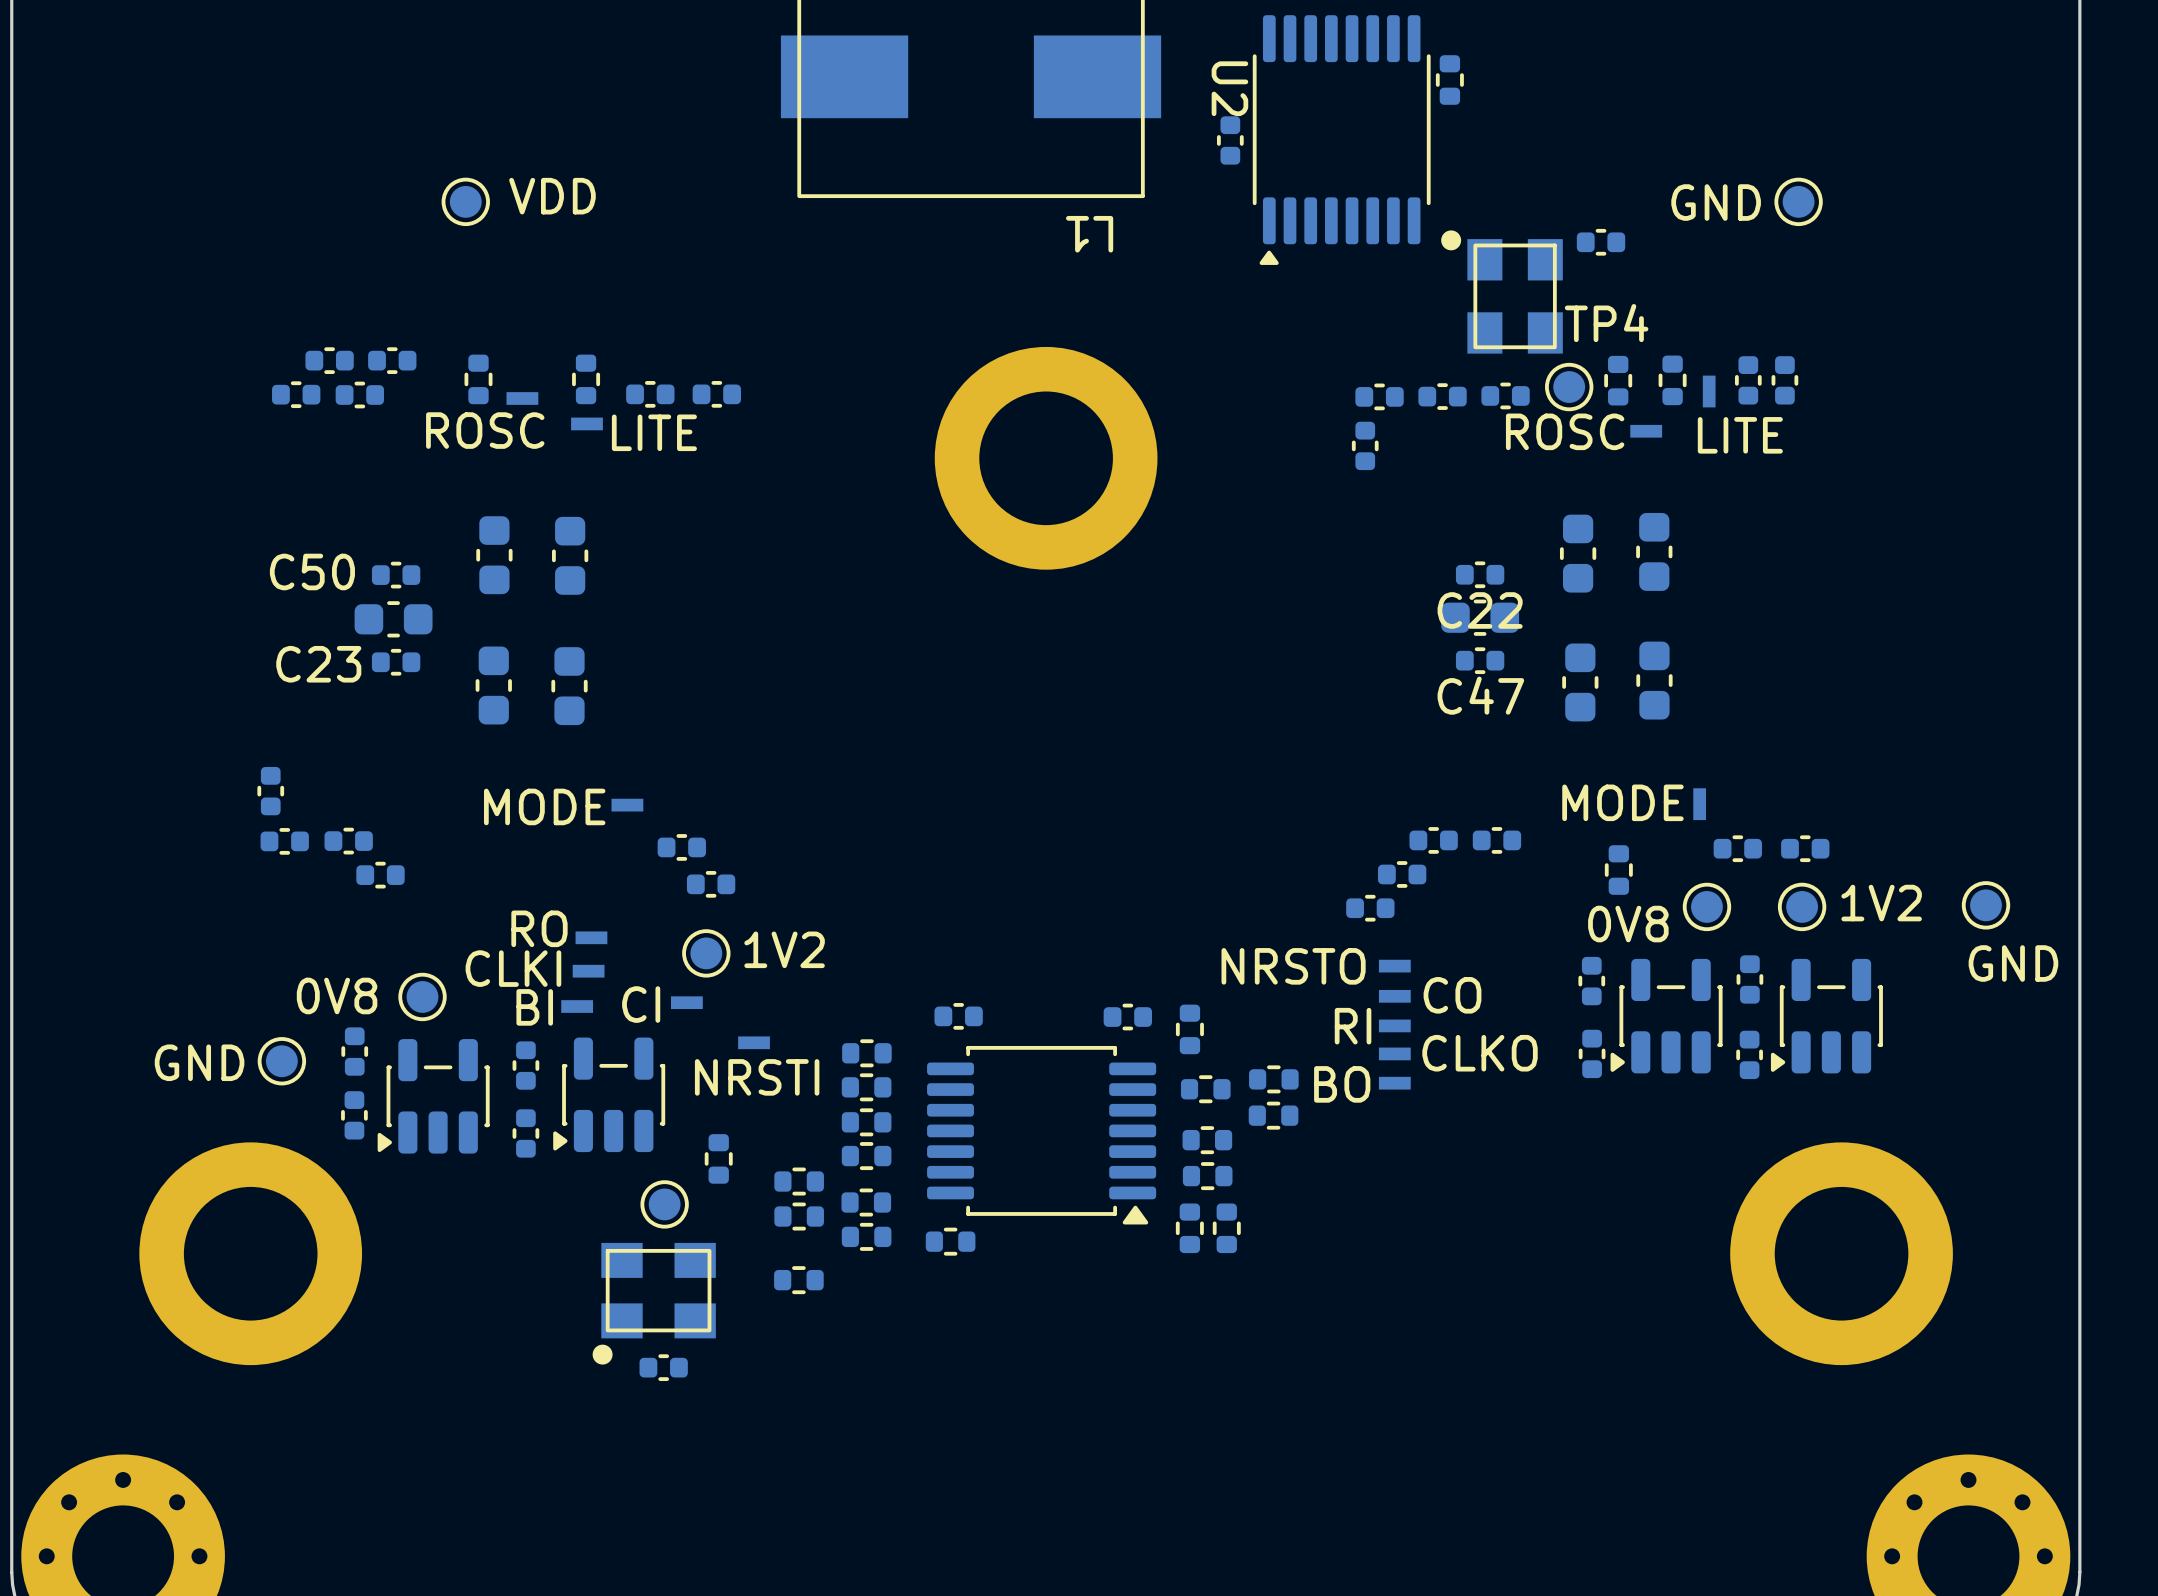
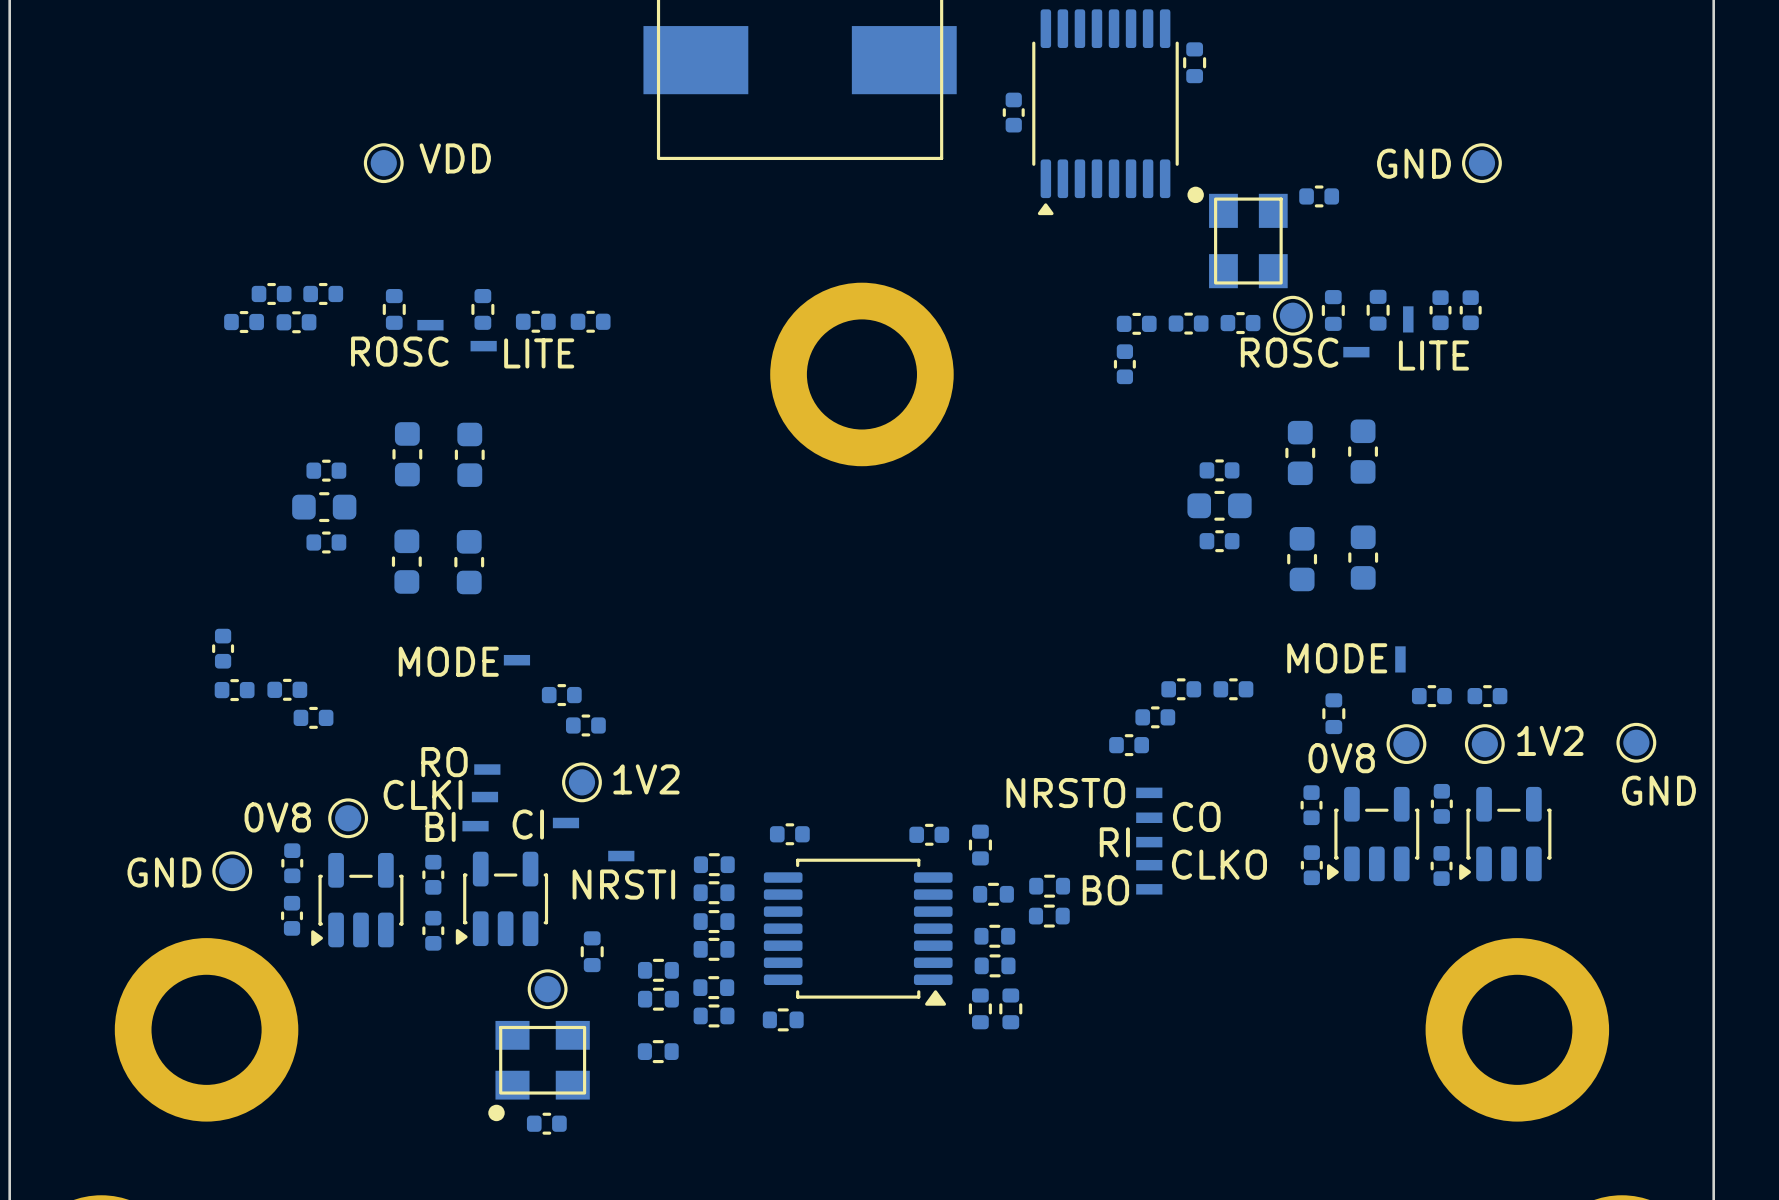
U2 name: U2 (1229, 88) -> none
L1 name: L1 (1089, 234) -> none
TP4 name: TP4 (1606, 323) -> none
C50 name: C50 (312, 571) -> none
C22 name: C22 (1480, 610) -> none
C23 name: C23 (318, 664) -> none
C47 name: C47 (1480, 695) -> none

